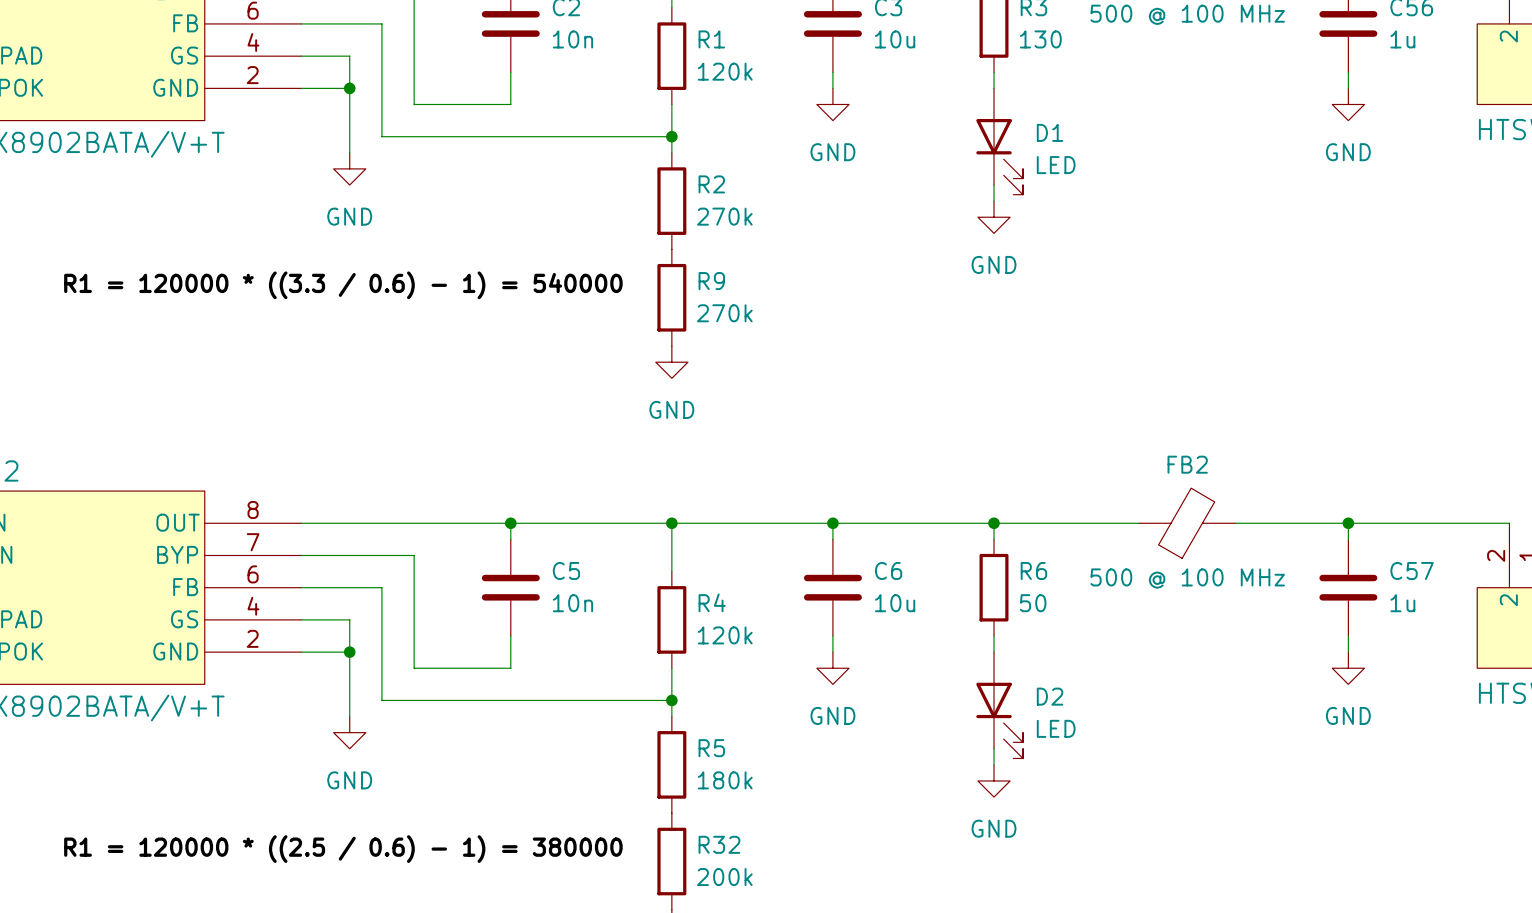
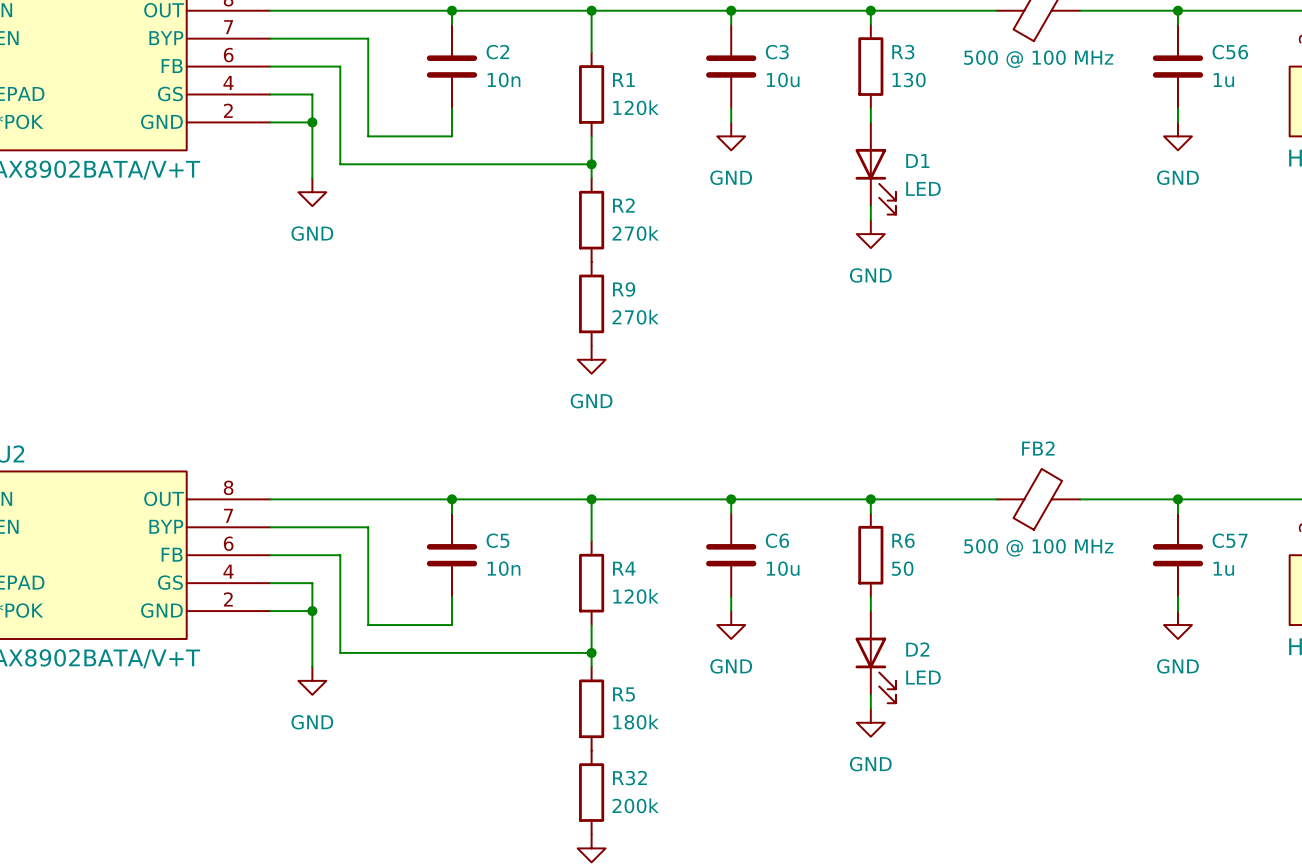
label: R1 = 120000 * ((3.3 / 0.6) - 1) = 540000 (343, 285) -> none
label: R1 = 120000 * ((2.5 / 0.6) - 1) = 380000 (343, 849) -> none

